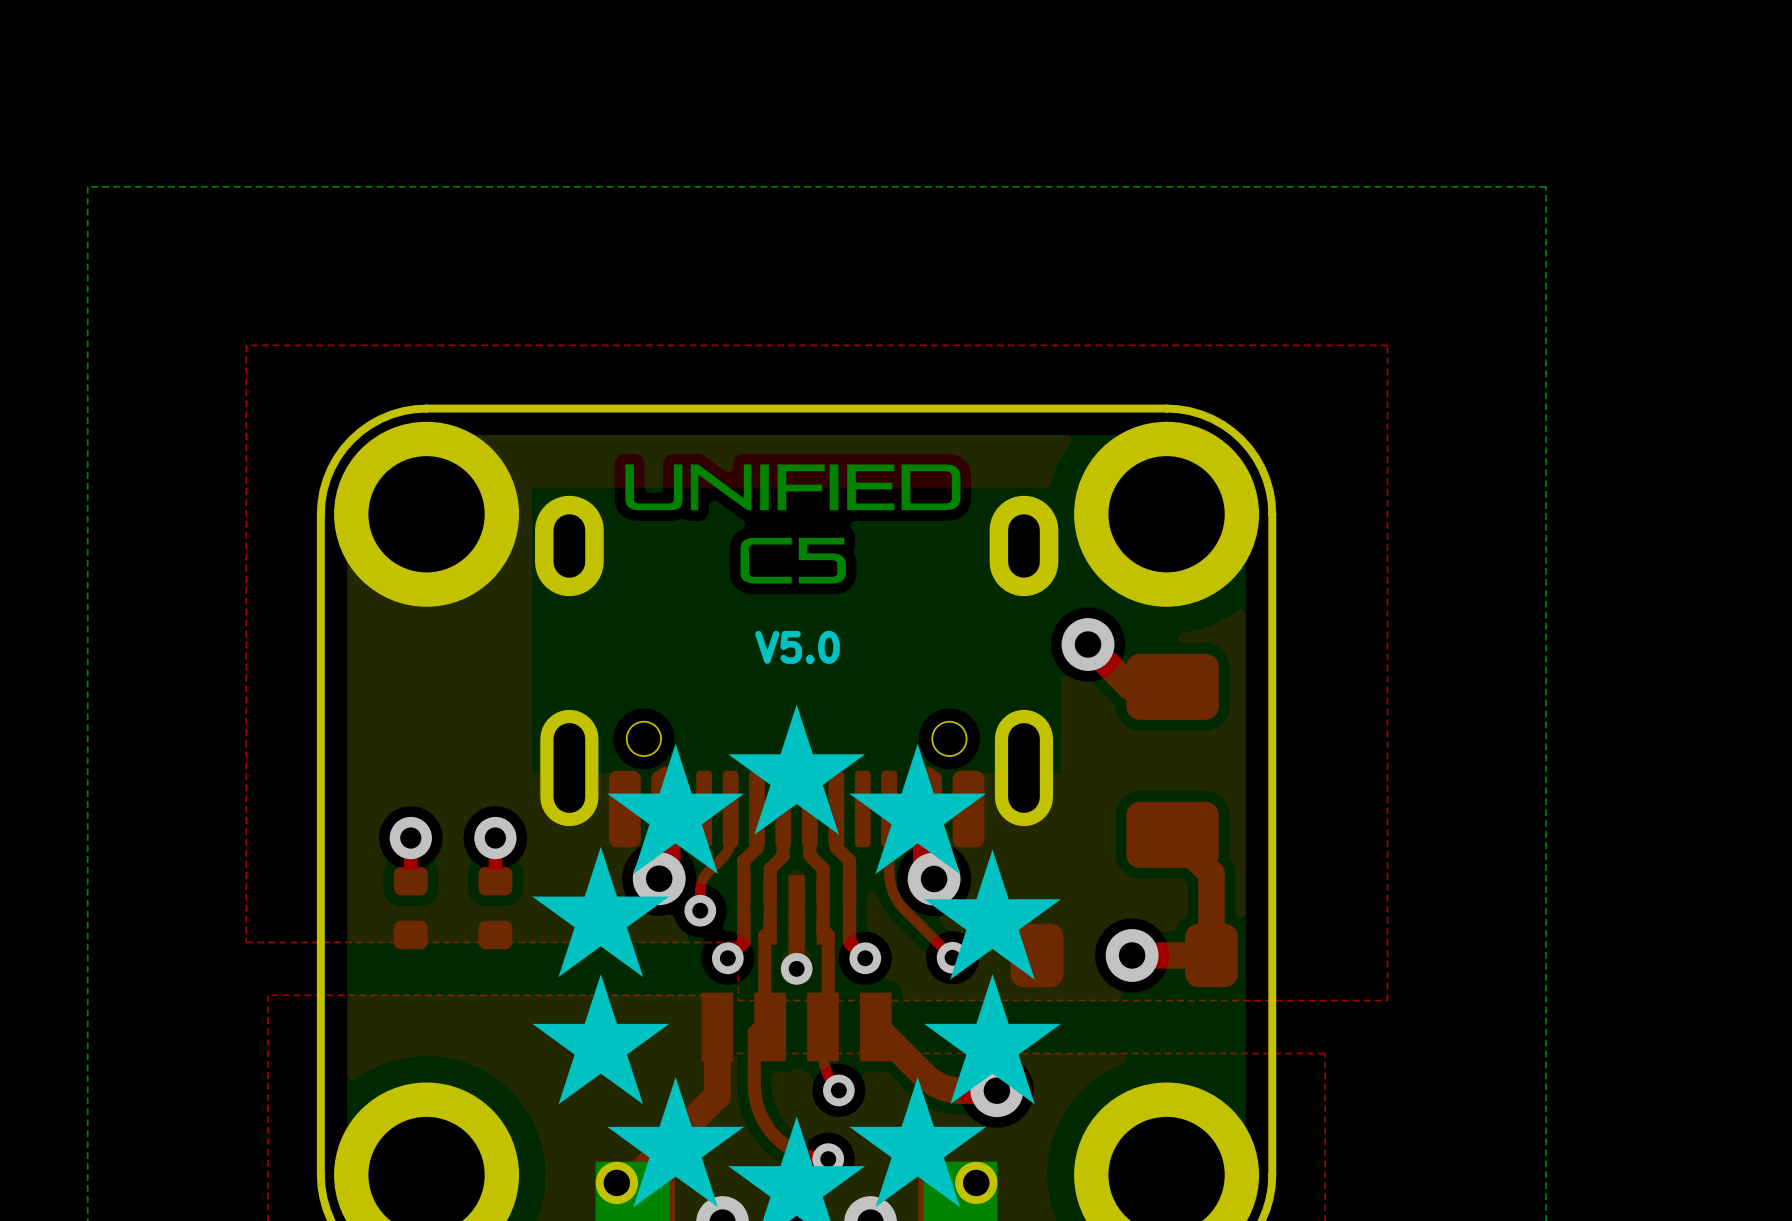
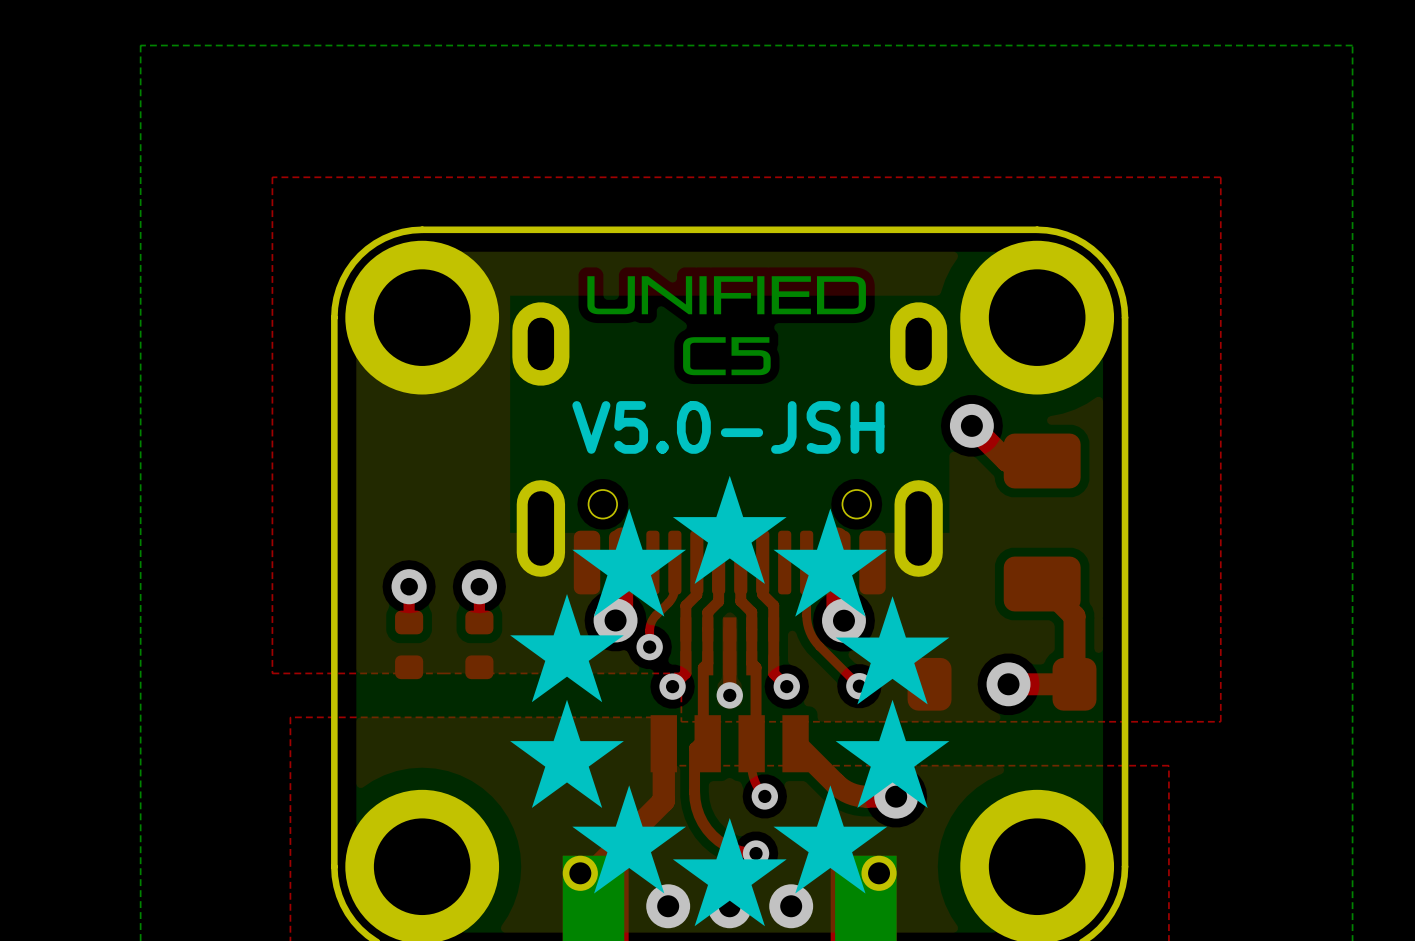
text: V5.0 (797, 647) -> V5.0-JSH (728, 427)

